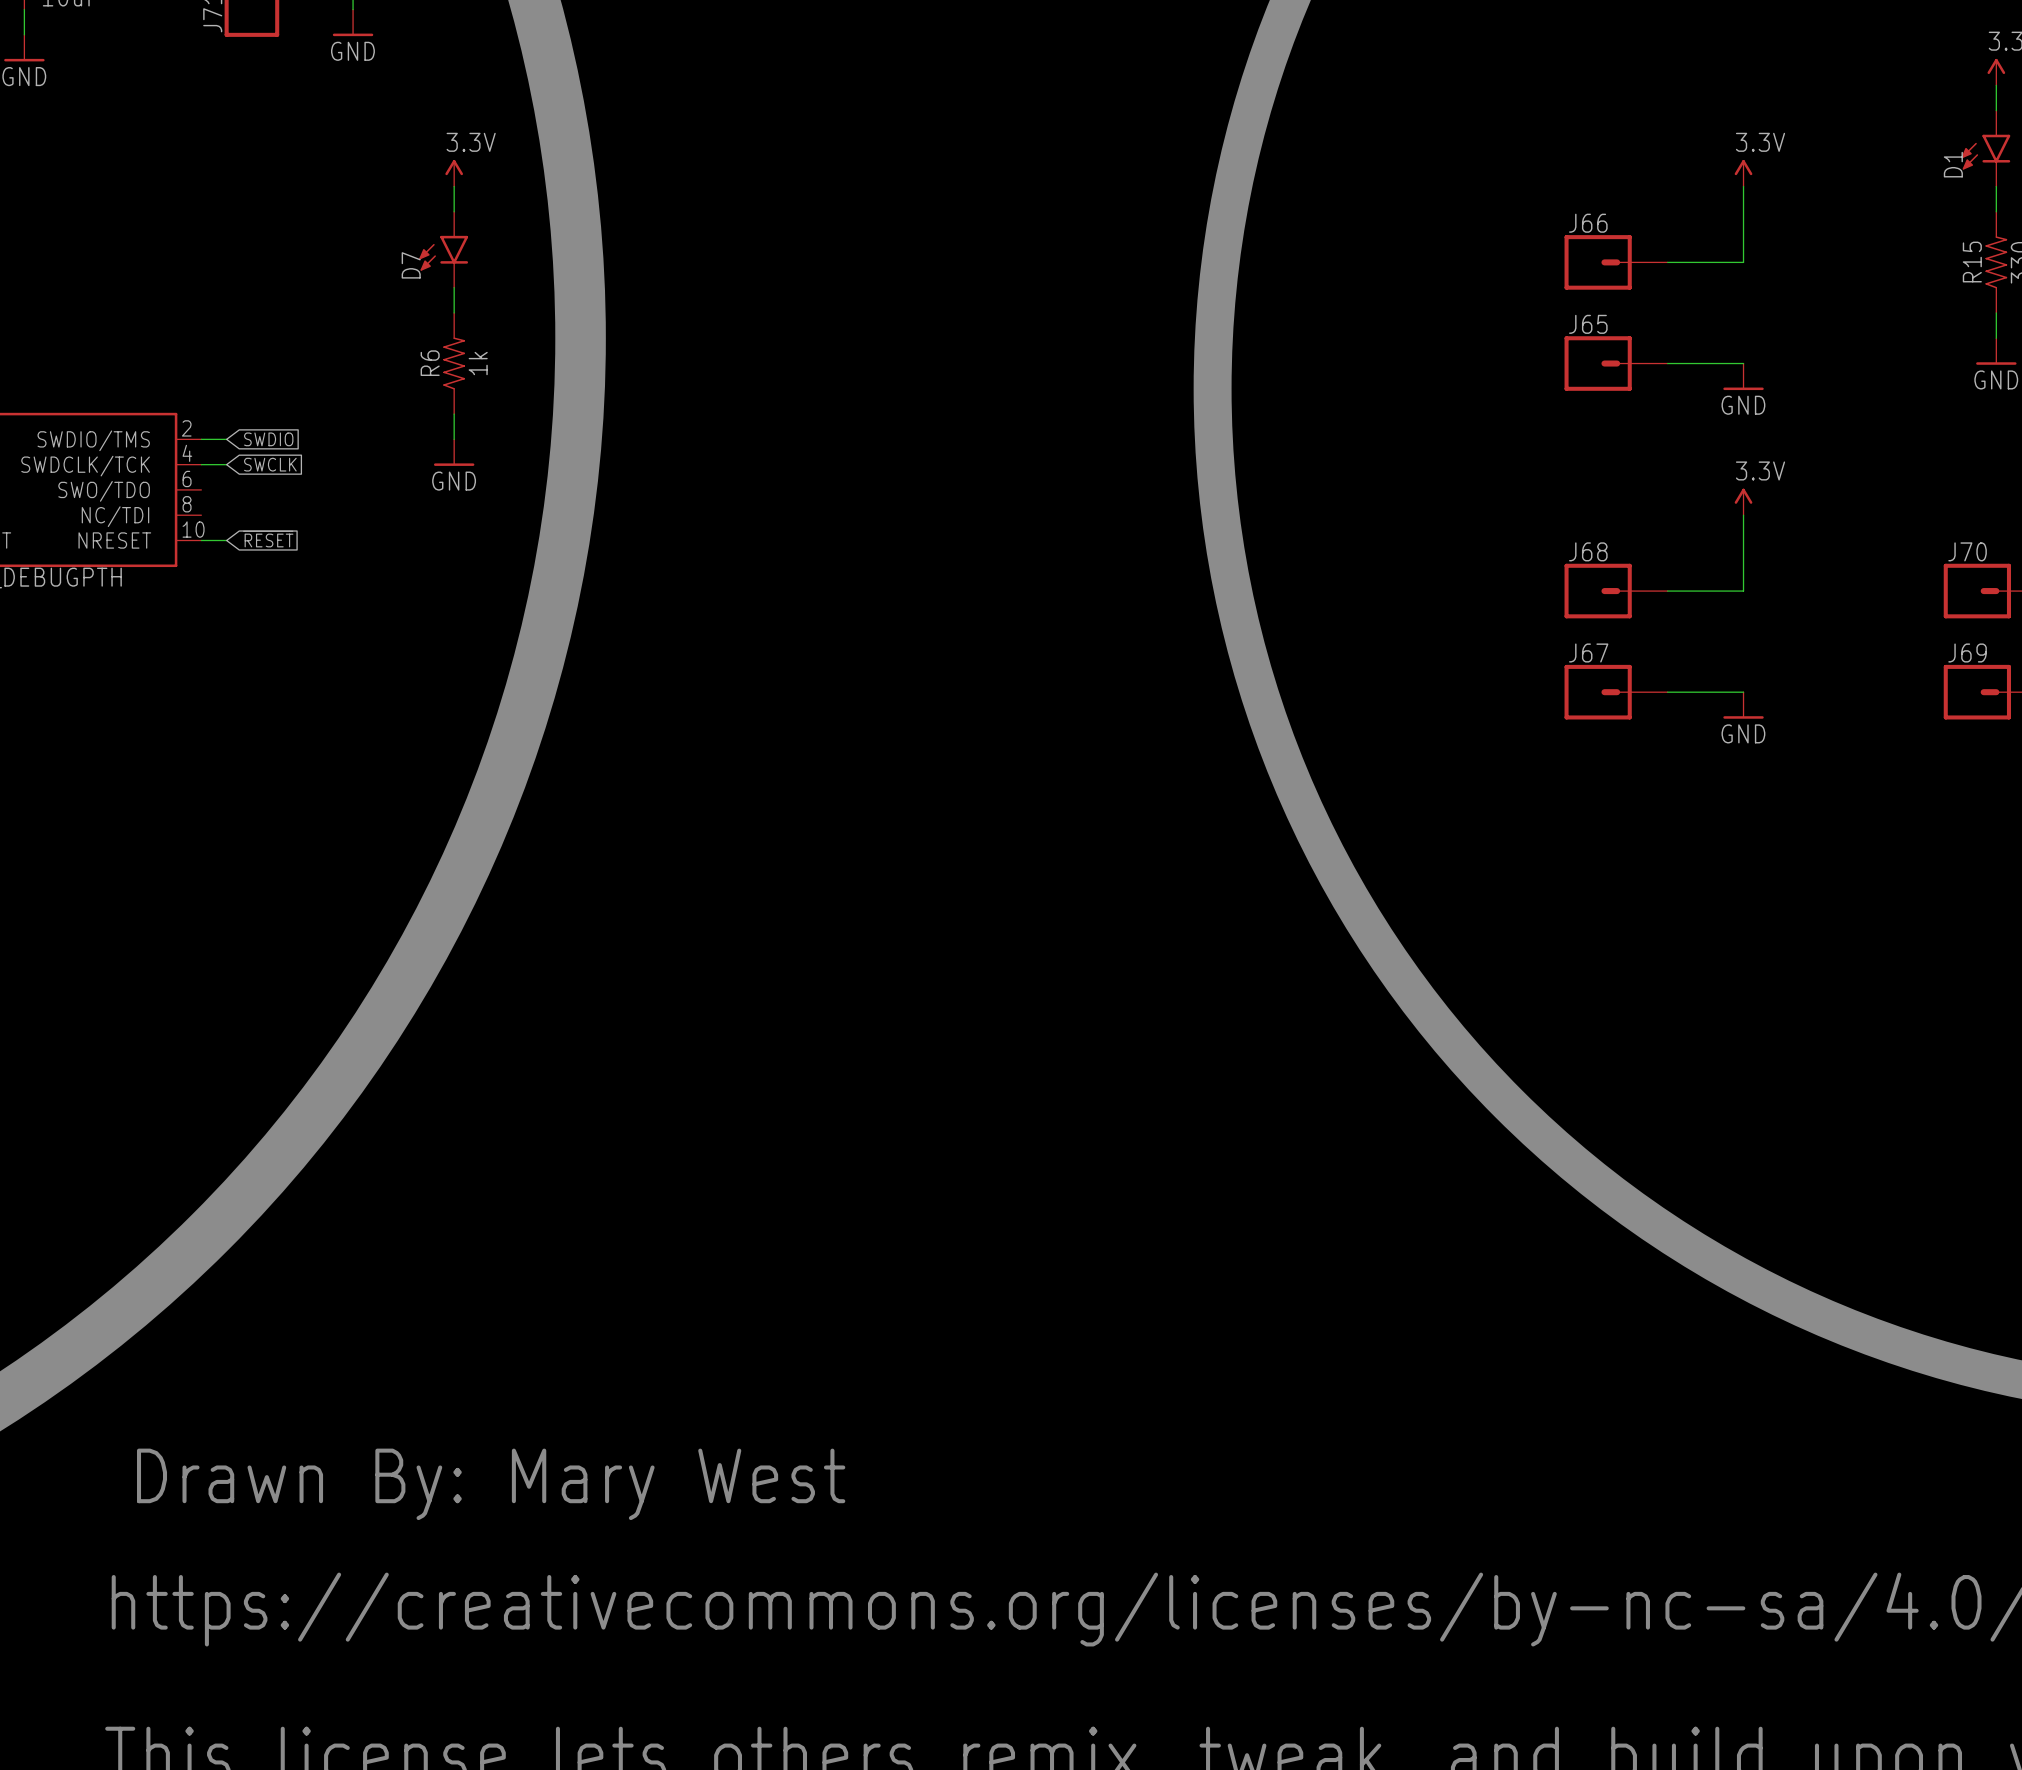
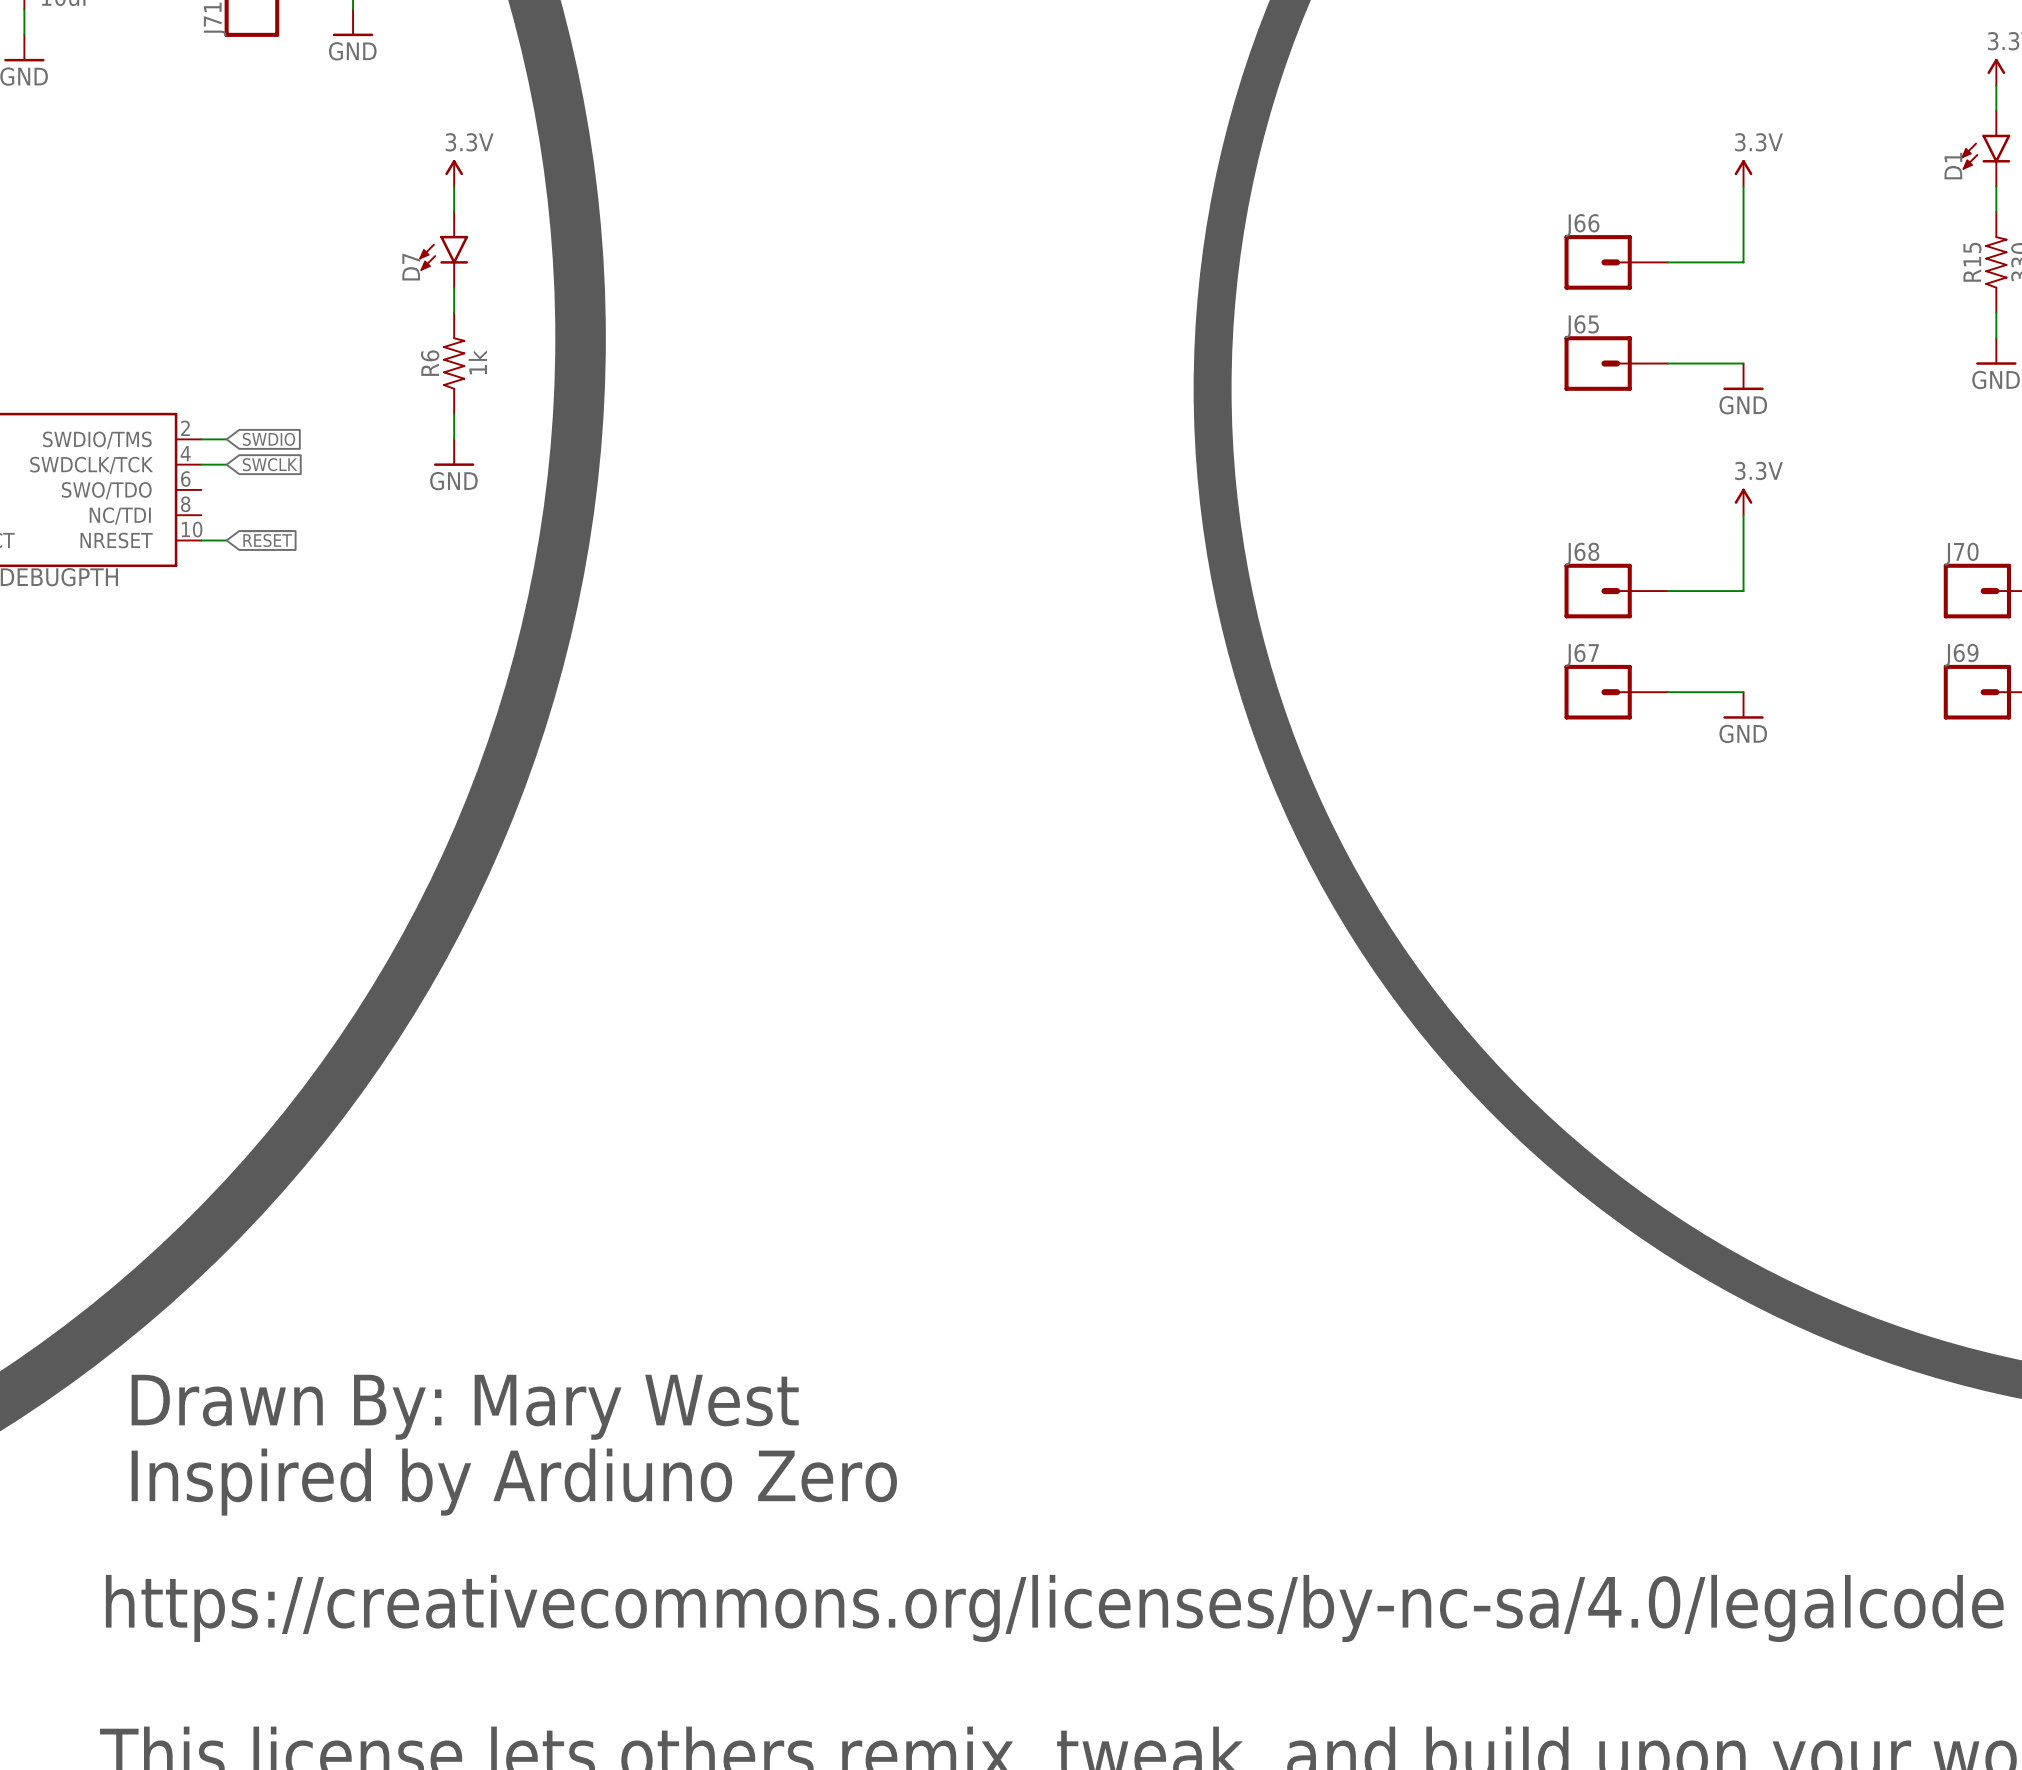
text: none -> Drawn By: Mary West (465, 1407)
text: Drawn By: Mary West (491, 1484) -> Inspired by Ardiuno Zero (514, 1482)

